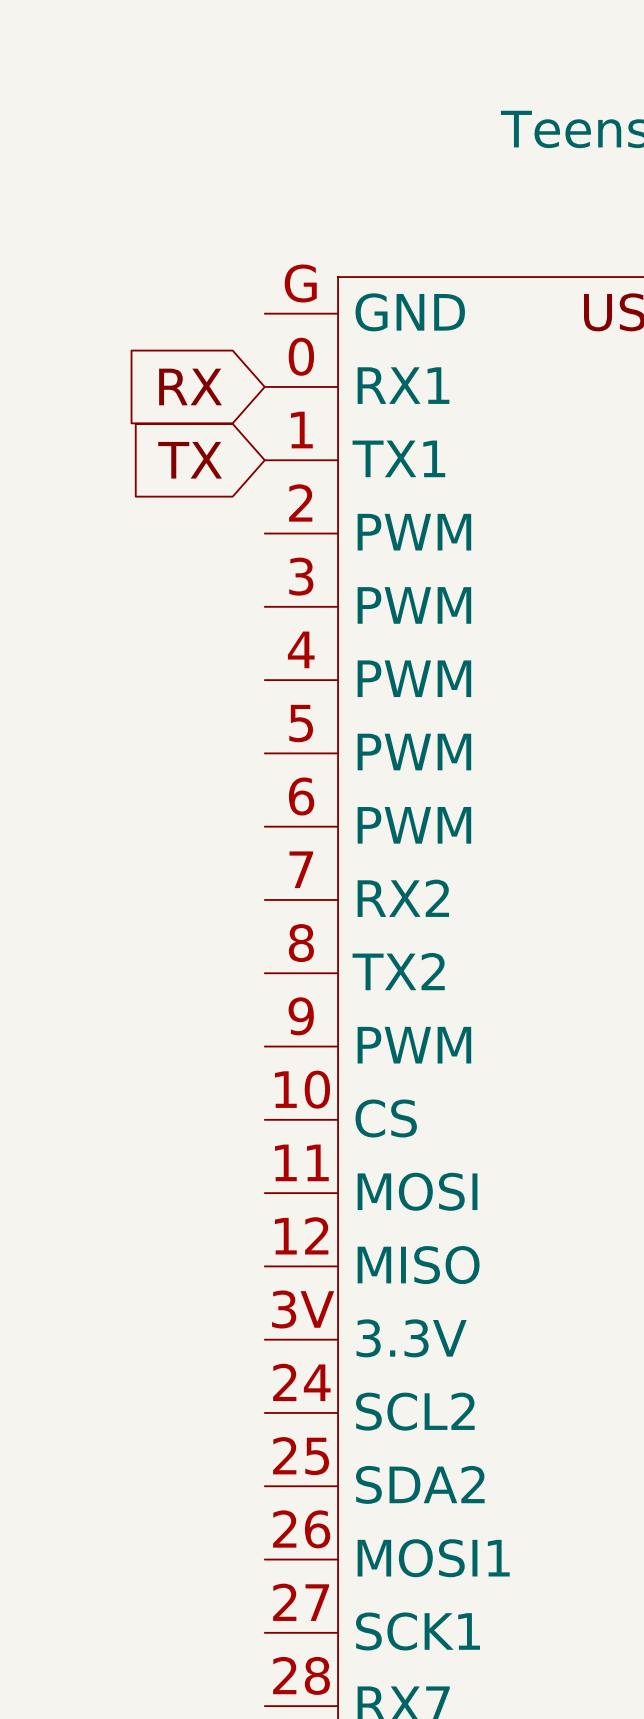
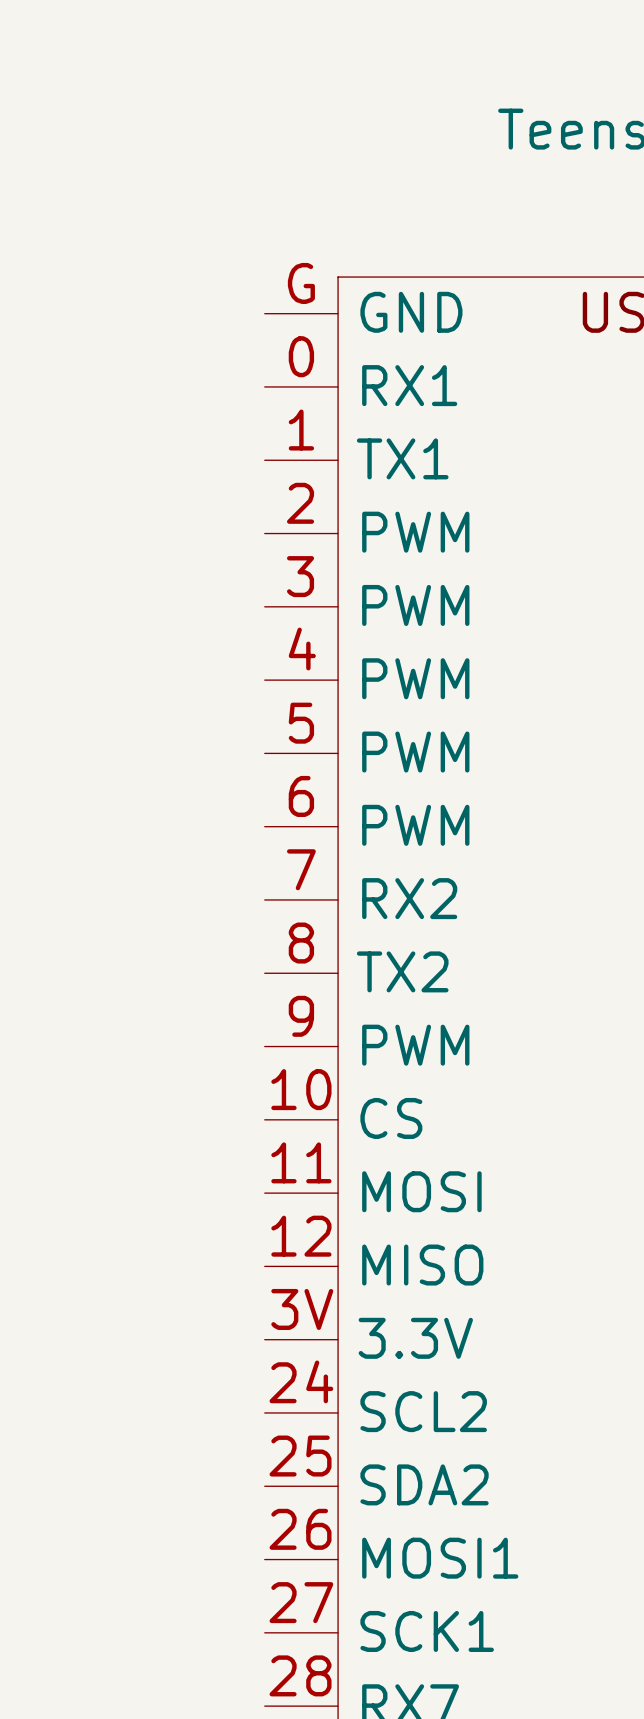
global label: RX (190, 386) -> none
global label: TX (190, 460) -> none

